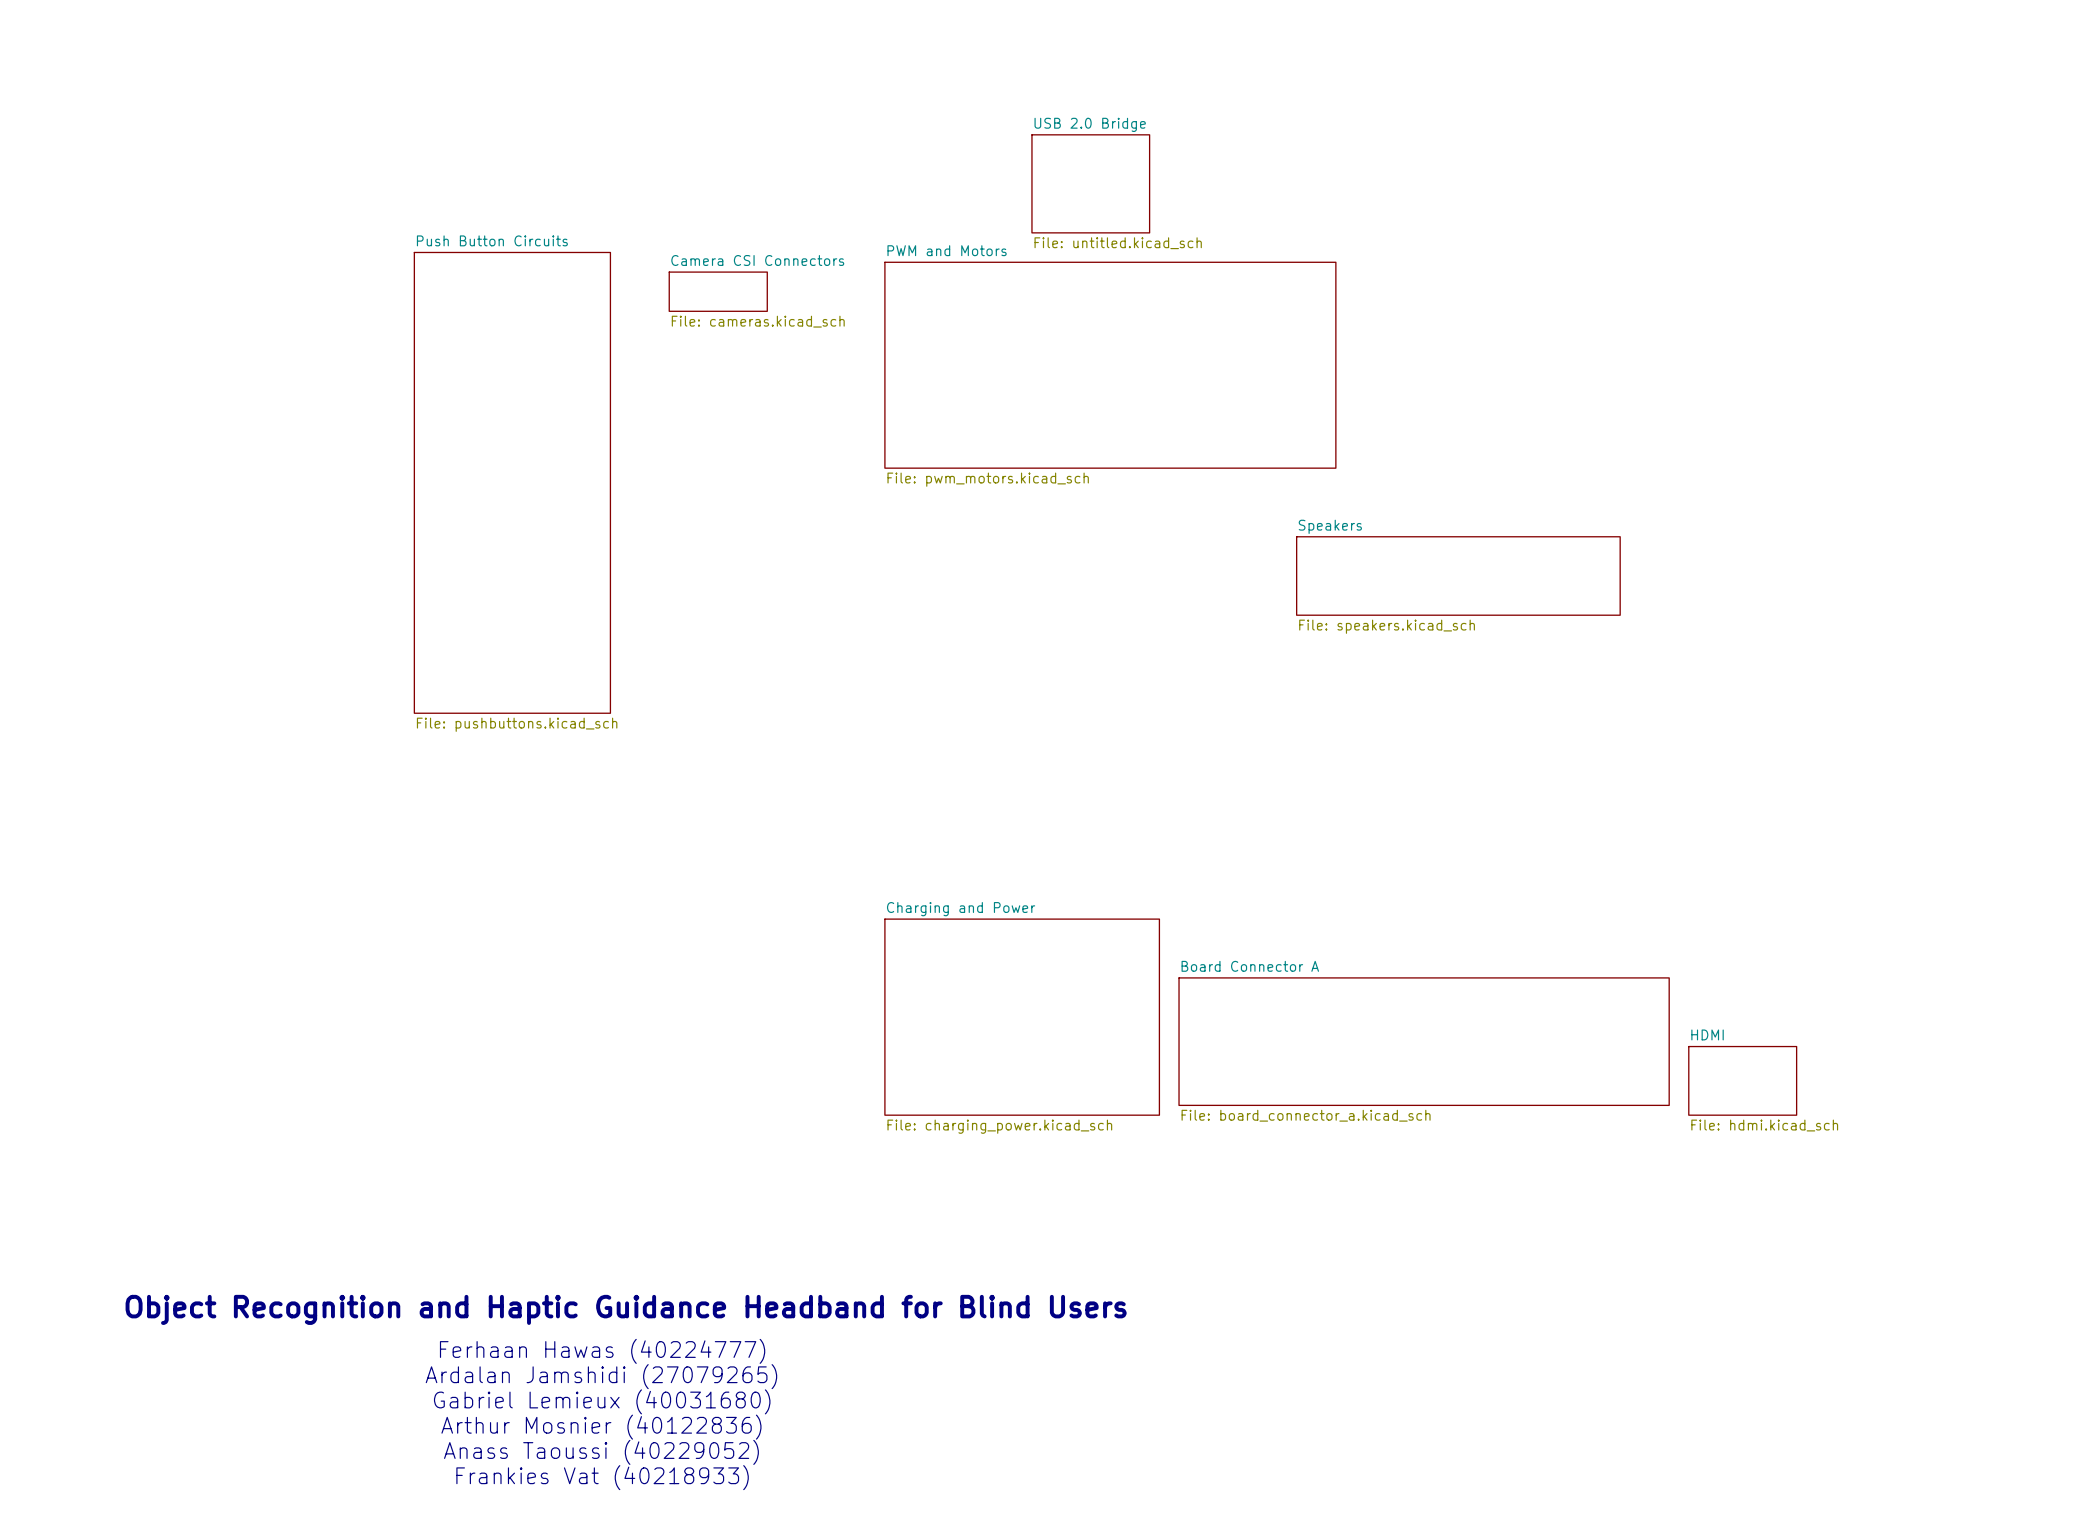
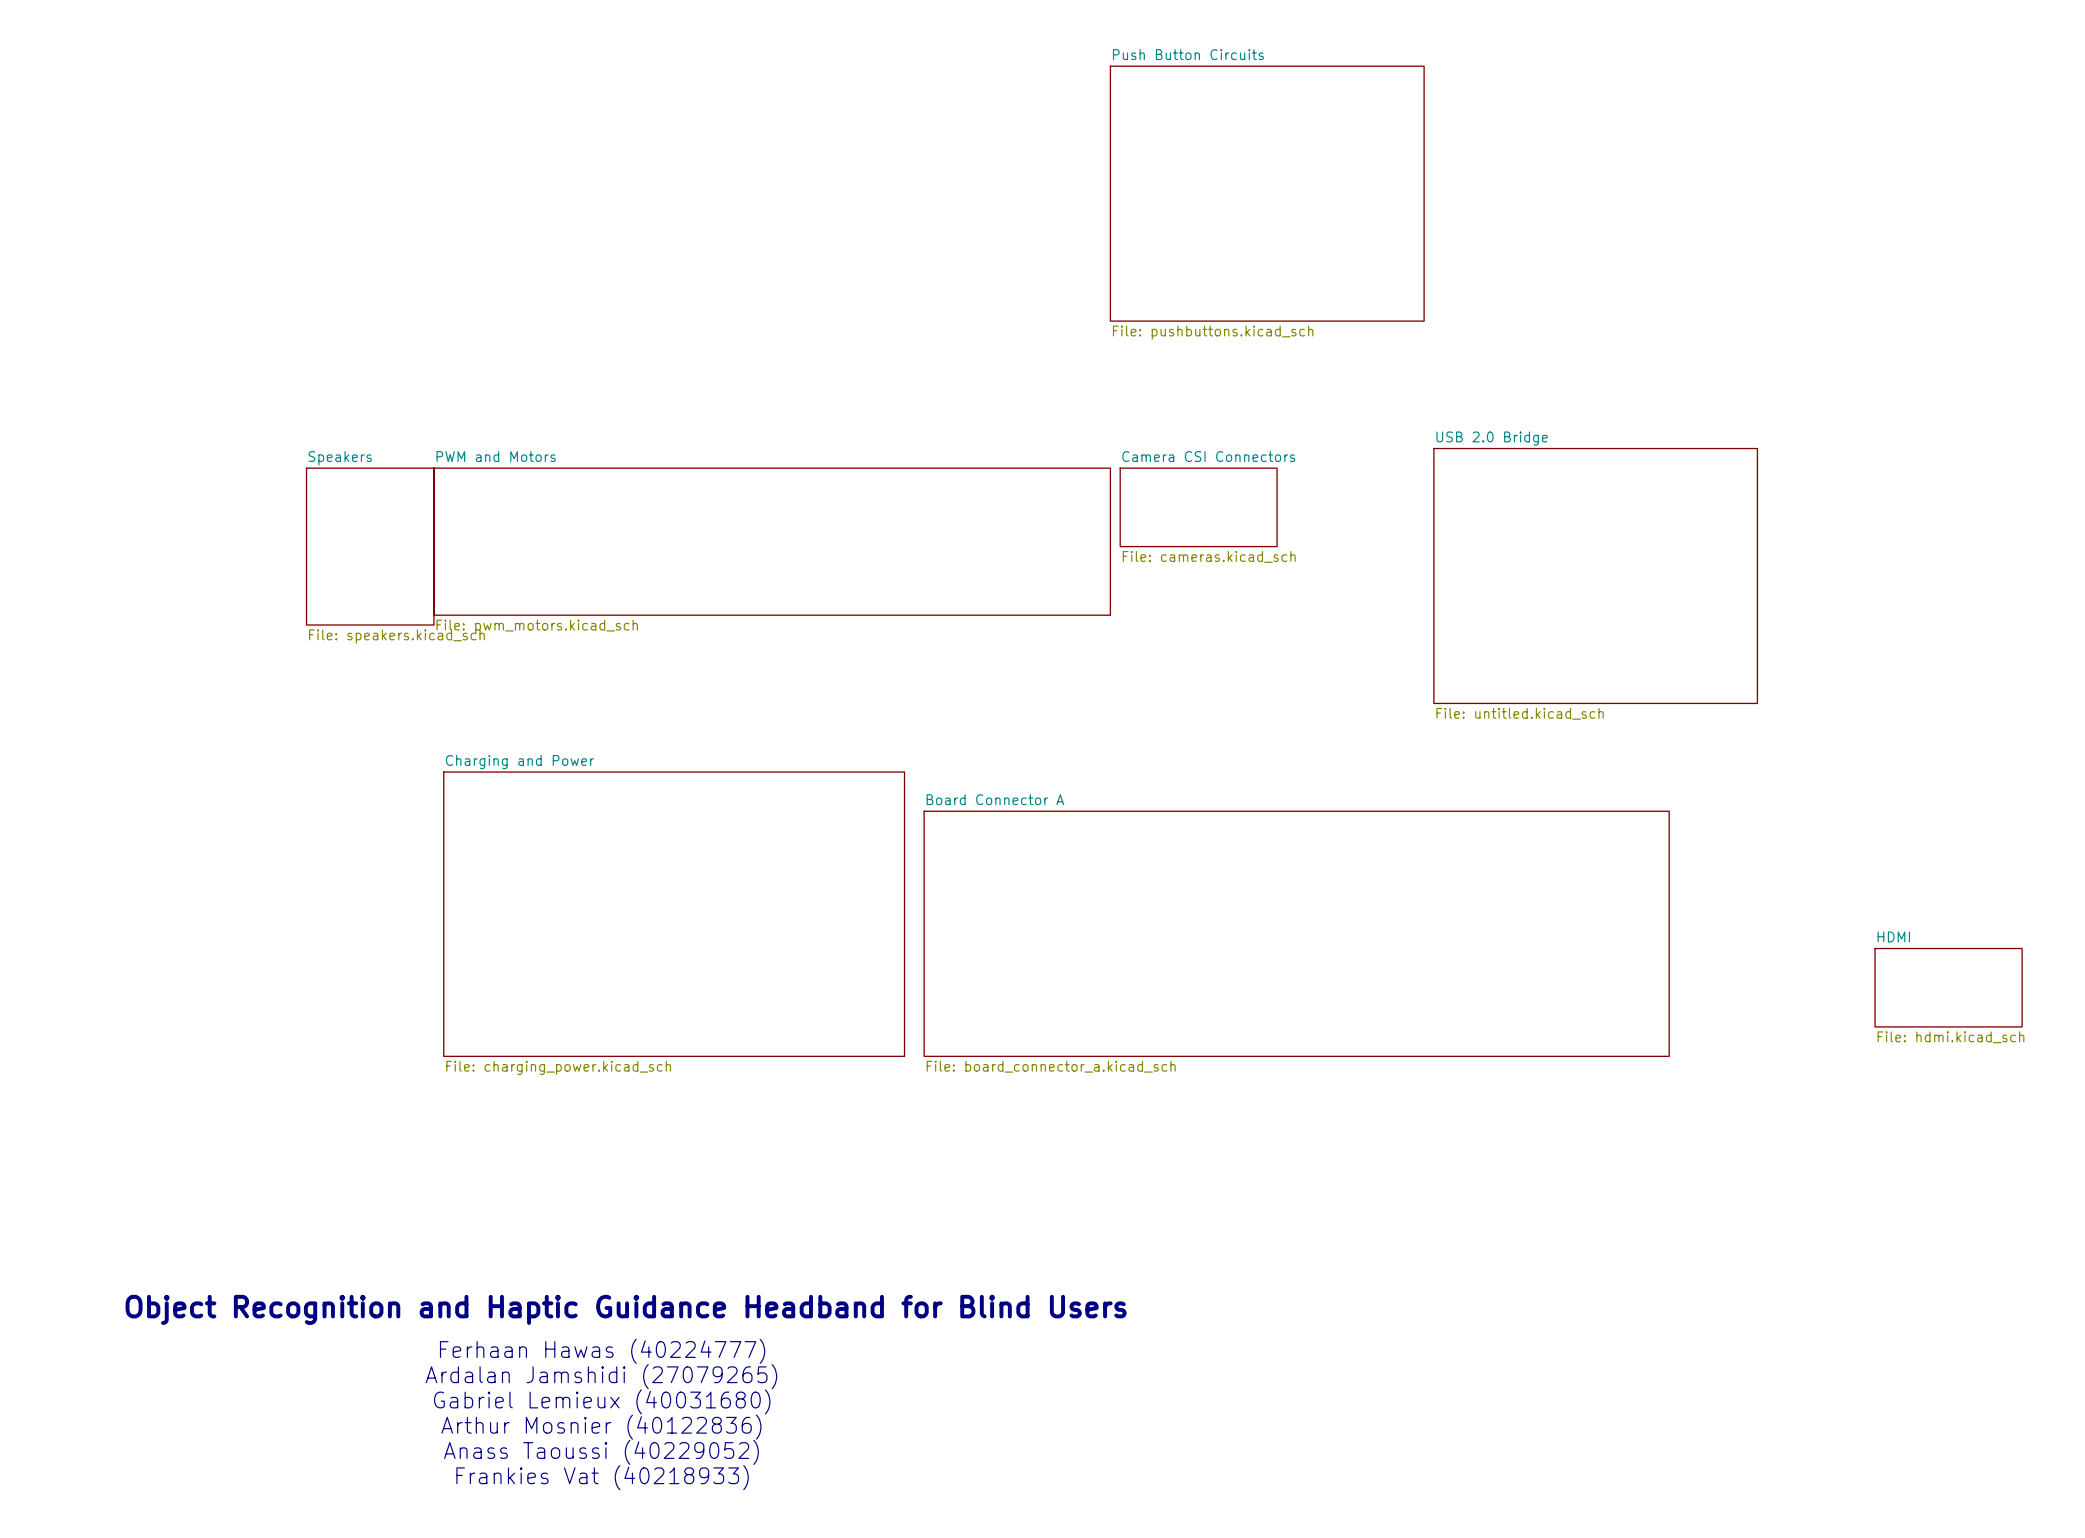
sheet USB 2.0 Bridge name position: USB 2.0 Bridge (1090, 124) -> USB 2.0 Bridge (1492, 438)
sheet USB 2.0 Bridge shape: [1031, 134, 1151, 234] -> [1433, 447, 1759, 705]
sheet Push Button Circuits: none -> File: pushbuttons.kicad_sch (1267, 193)
sheet USB 2.0 Bridge value position: File: untitled.kicad_sch (1118, 243) -> File: untitled.kicad_sch (1520, 713)
sheet Camera CSI Connectors: File: cameras.kicad_sch (718, 291) -> none
sheet PWM and Motors: File: pwm_motors.kicad_sch (1110, 365) -> none
sheet Push Button Circuits: File: pushbuttons.kicad_sch (512, 482) -> none
sheet Camera CSI Connectors: none -> File: cameras.kicad_sch (1198, 507)
sheet PWM and Motors: none -> File: pwm_motors.kicad_sch (772, 541)
sheet Speakers: none -> File: speakers.kicad_sch (370, 546)
sheet Speakers: File: speakers.kicad_sch (1458, 575) -> none
sheet Charging and Power: none -> File: charging_power.kicad_sch (674, 914)
sheet Board Connector A: none -> File: board_connector_a.kicad_sch (1296, 933)
sheet HDMI: none -> File: hdmi.kicad_sch (1948, 987)
sheet Charging and Power: File: charging_power.kicad_sch (1022, 1017) -> none
sheet Board Connector A: File: board_connector_a.kicad_sch (1424, 1041) -> none
sheet HDMI: File: hdmi.kicad_sch (1742, 1080) -> none

